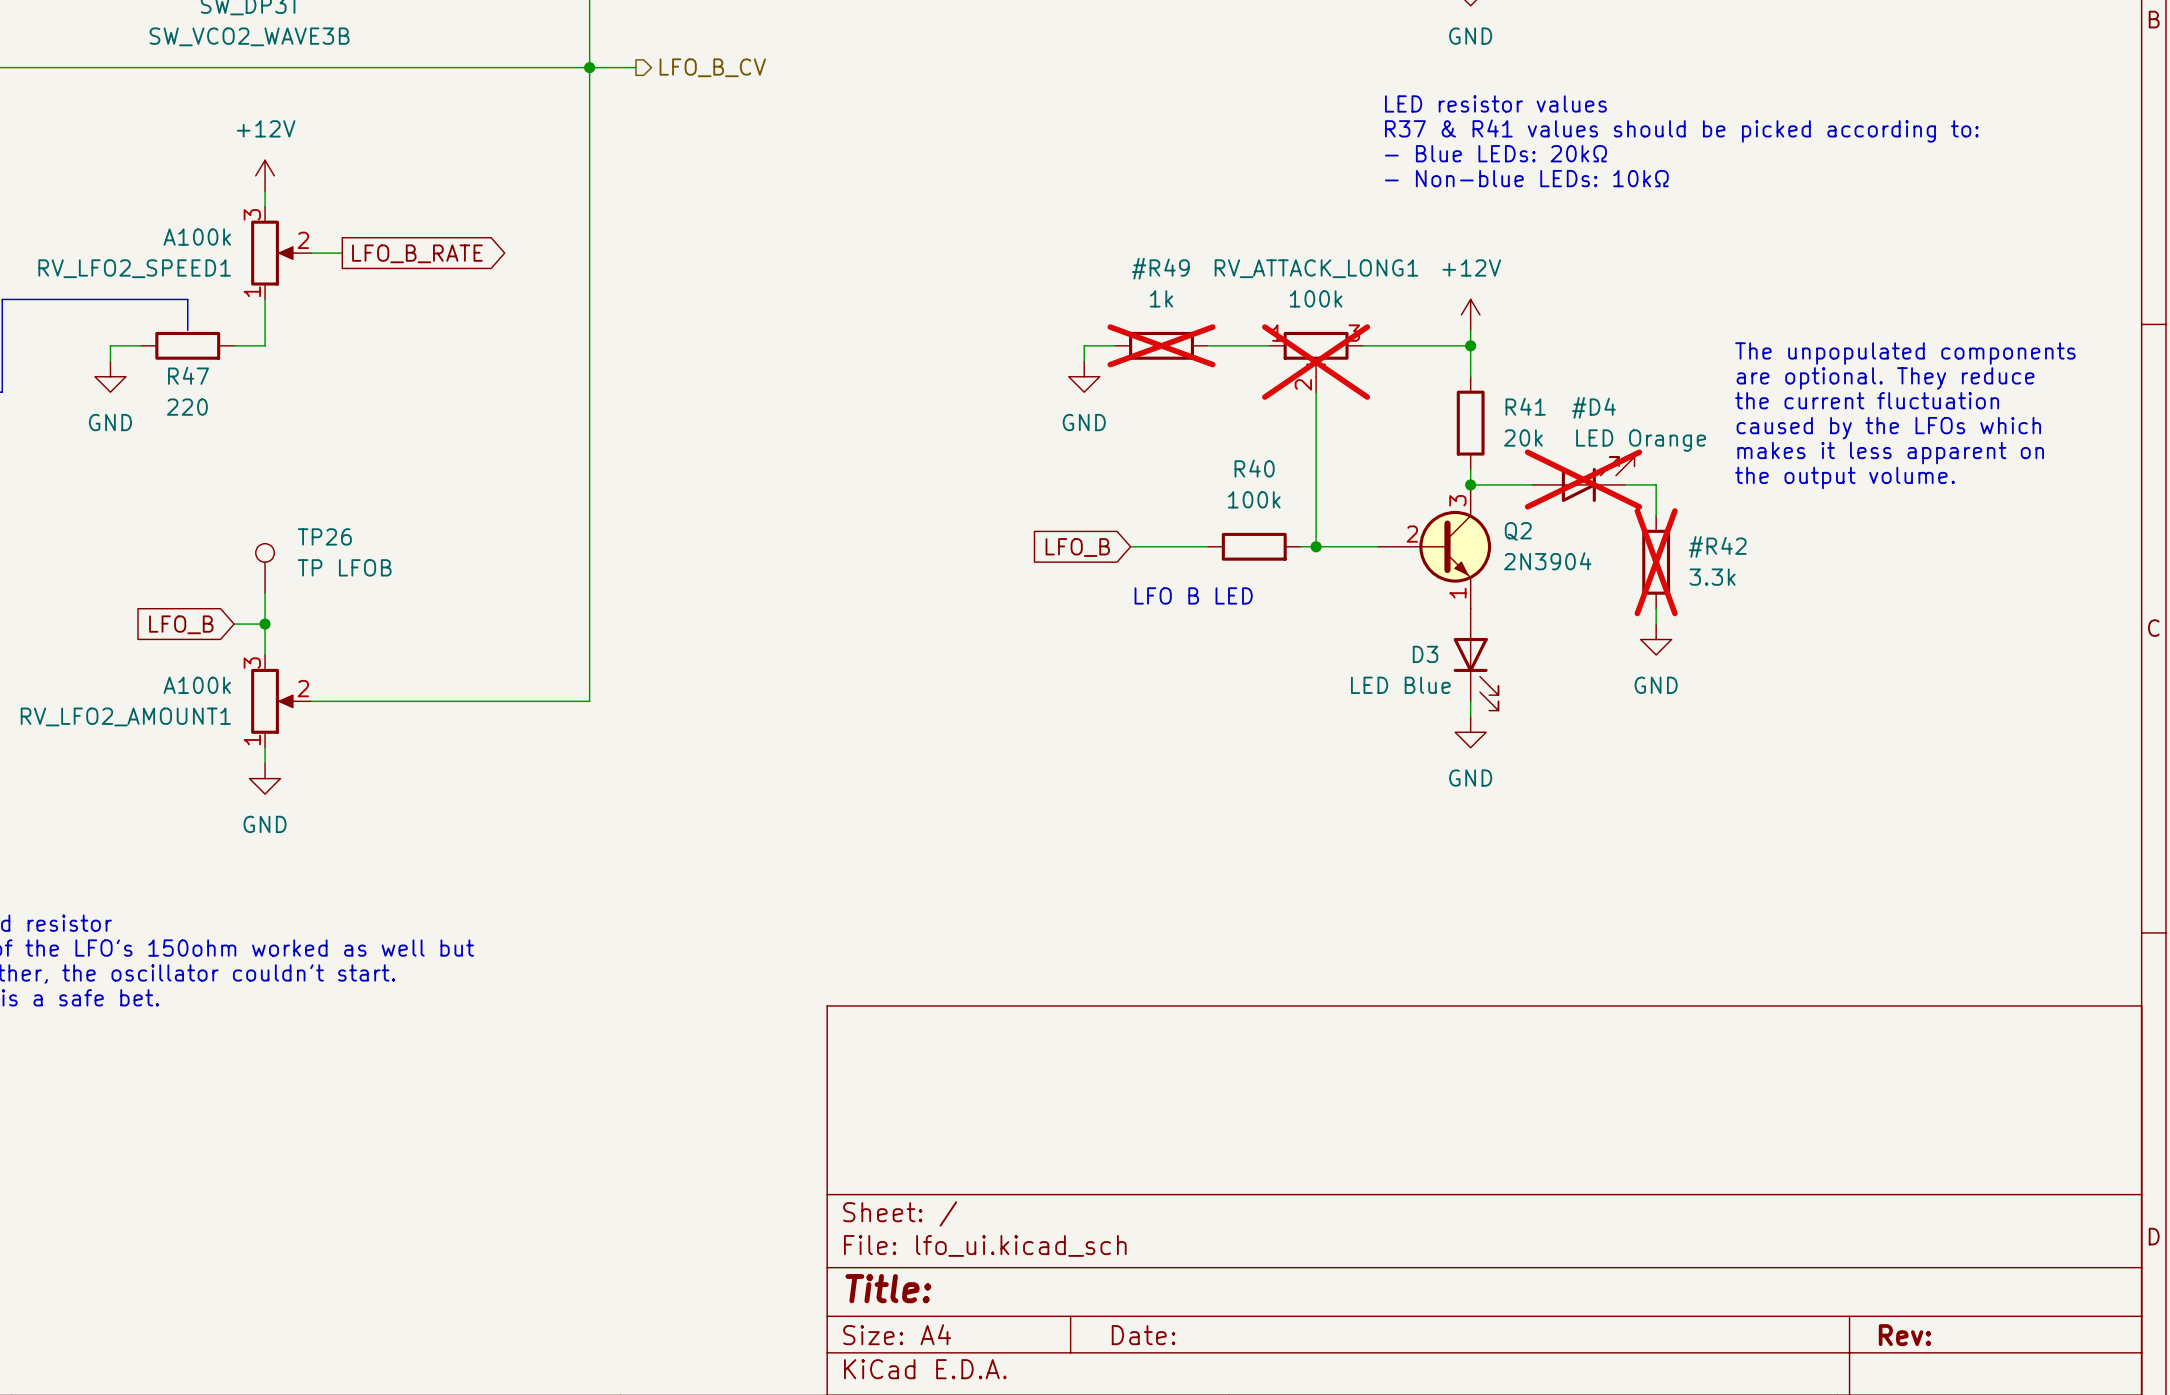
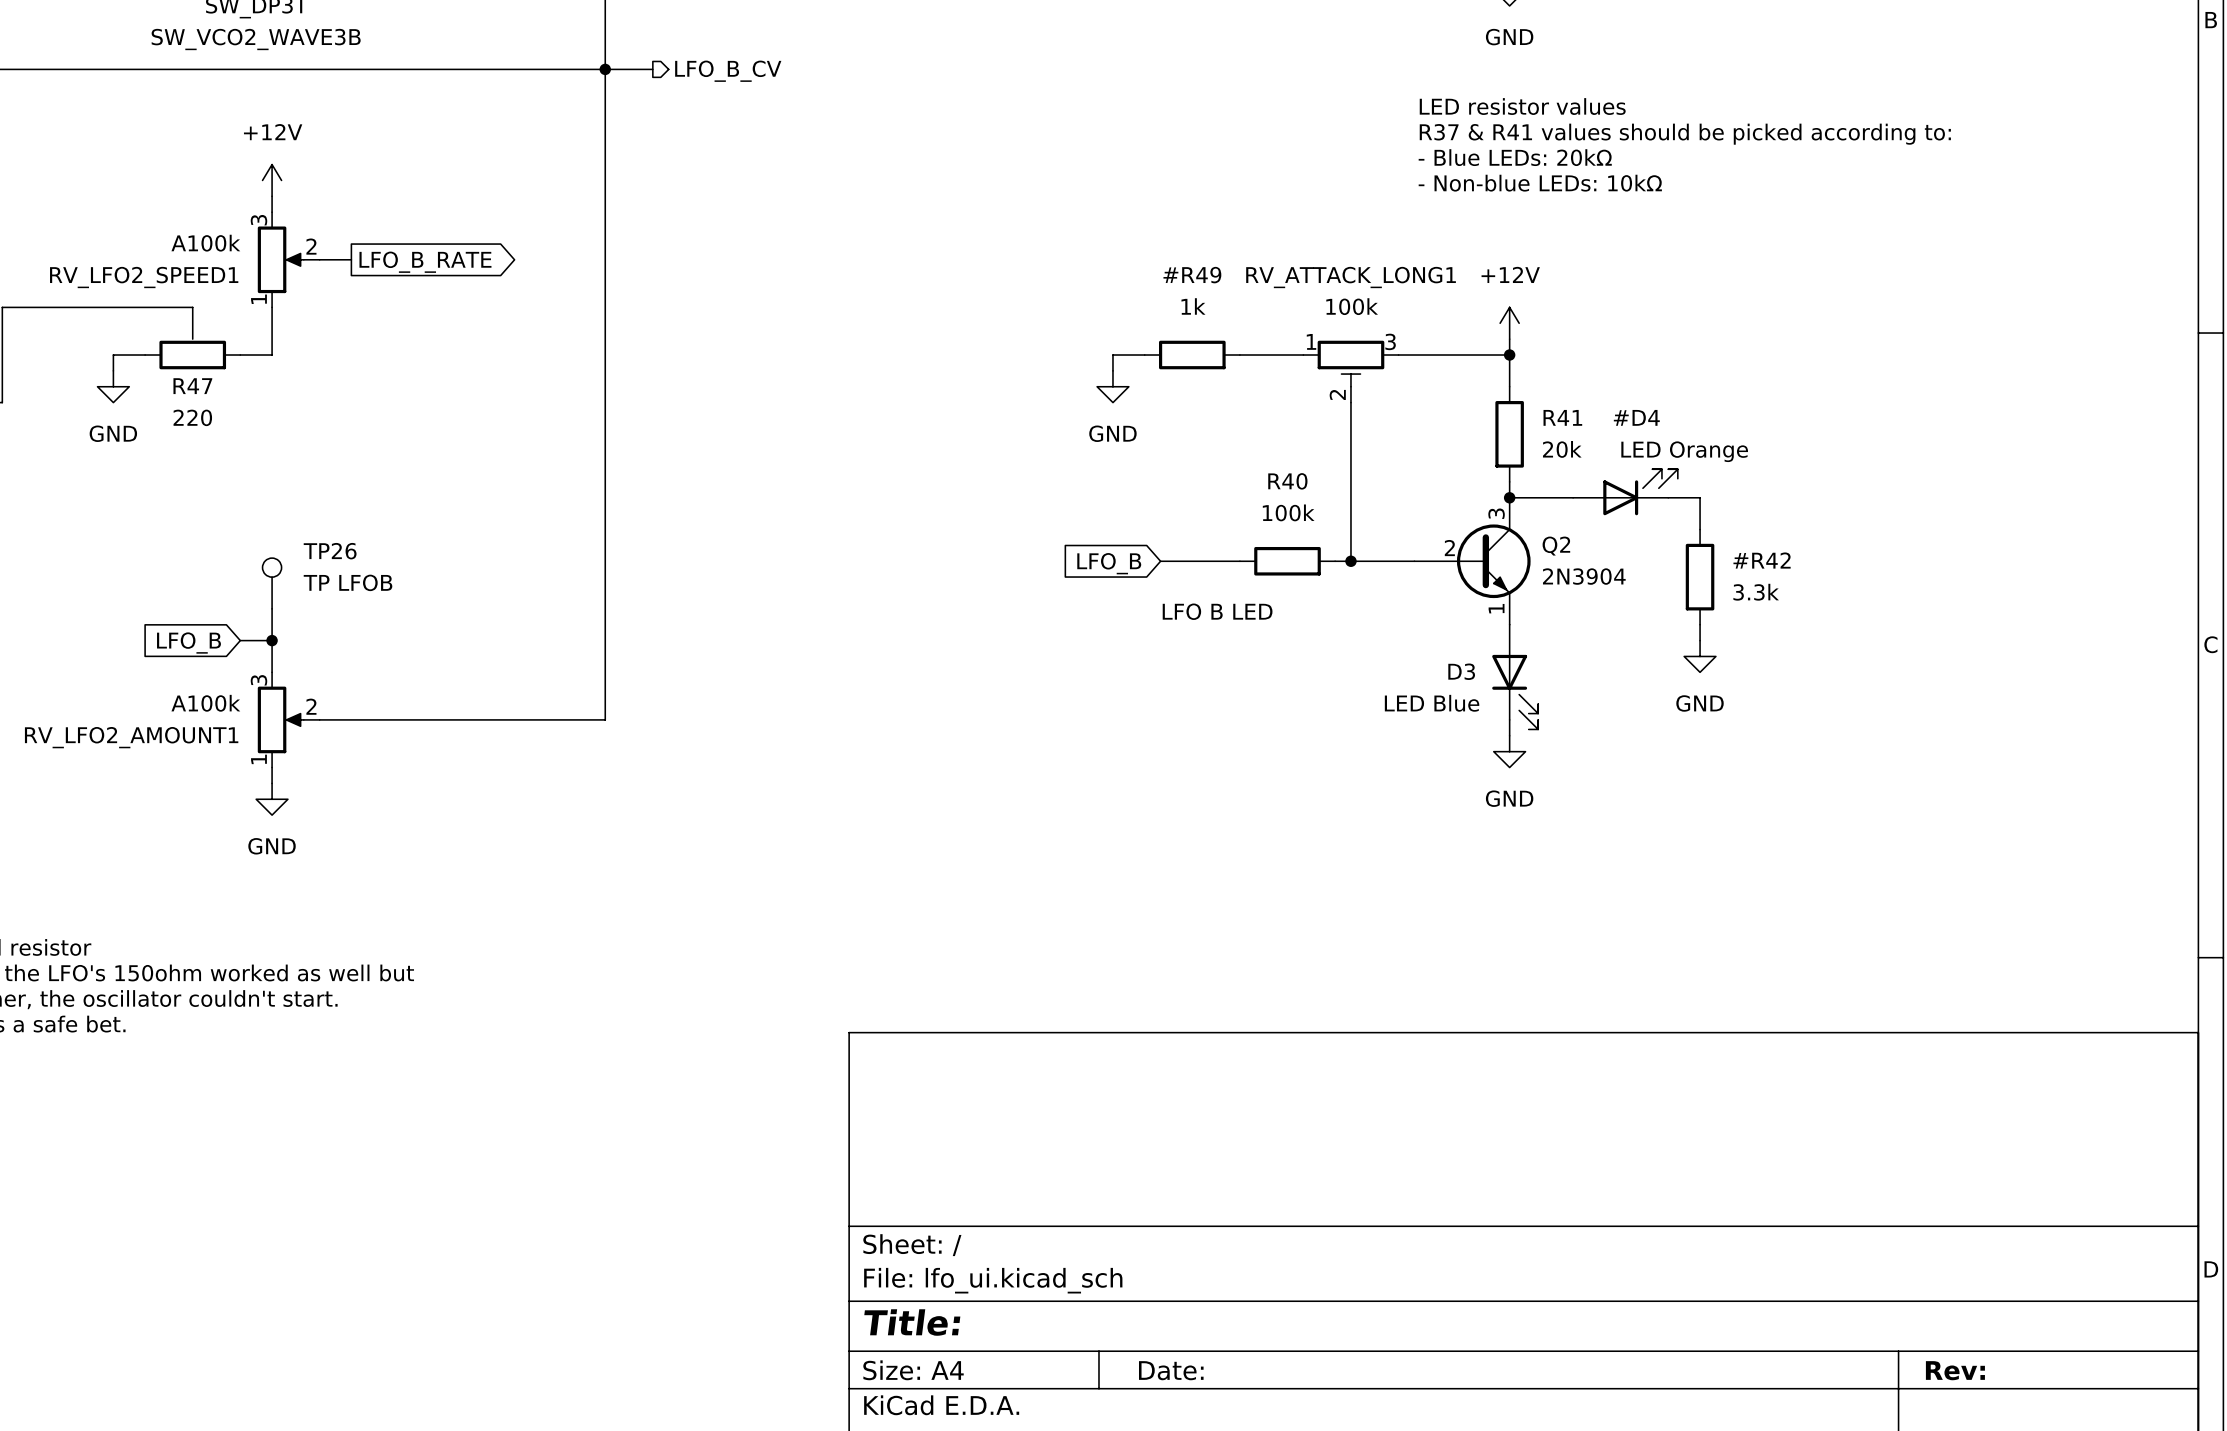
#R49 do-not-place cross: (1161, 345) -> none
text: The unpopulated components (1905, 353) -> none
RV_ATTACK_LONG1 do-not-place cross: (1316, 362) -> none
text: are optional. They reduce (1885, 378) -> none
text: the current fluctuation (1867, 400) -> none
text: caused by the LFOs which (1888, 428) -> none
text: makes it less apparent on (1890, 453) -> none
text: the output volume. (1845, 477) -> none
#D4 do-not-place cross: (1583, 479) -> none
#R42 do-not-place cross: (1656, 562) -> none

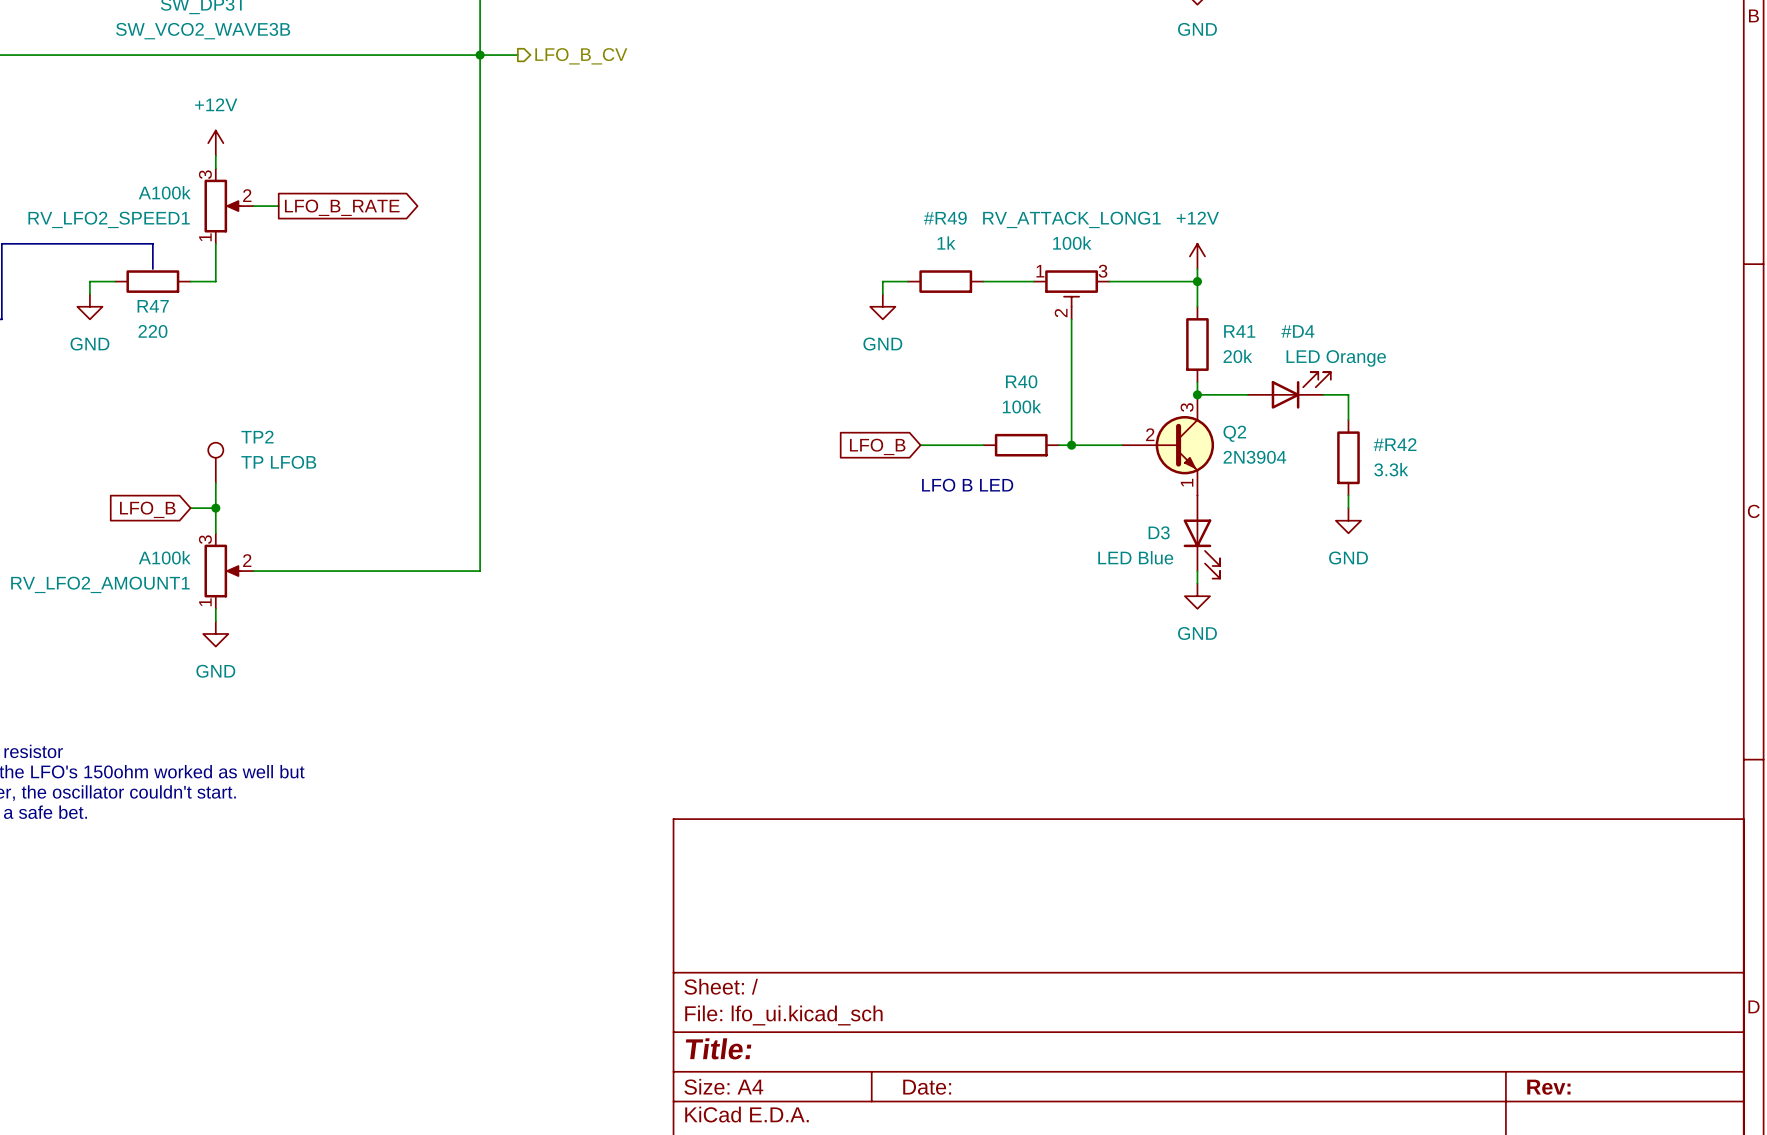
text: LED resistor values (1522, 106) -> none
text: R37 & R41 values should be picked according to: (1685, 134) -> none
text: - Blue LEDs: 20kΩ (1515, 157) -> none
text: - Non-blue LEDs: 10kΩ (1540, 183) -> none
TP26 name: TP26 (330, 551) -> TP2 (257, 437)

